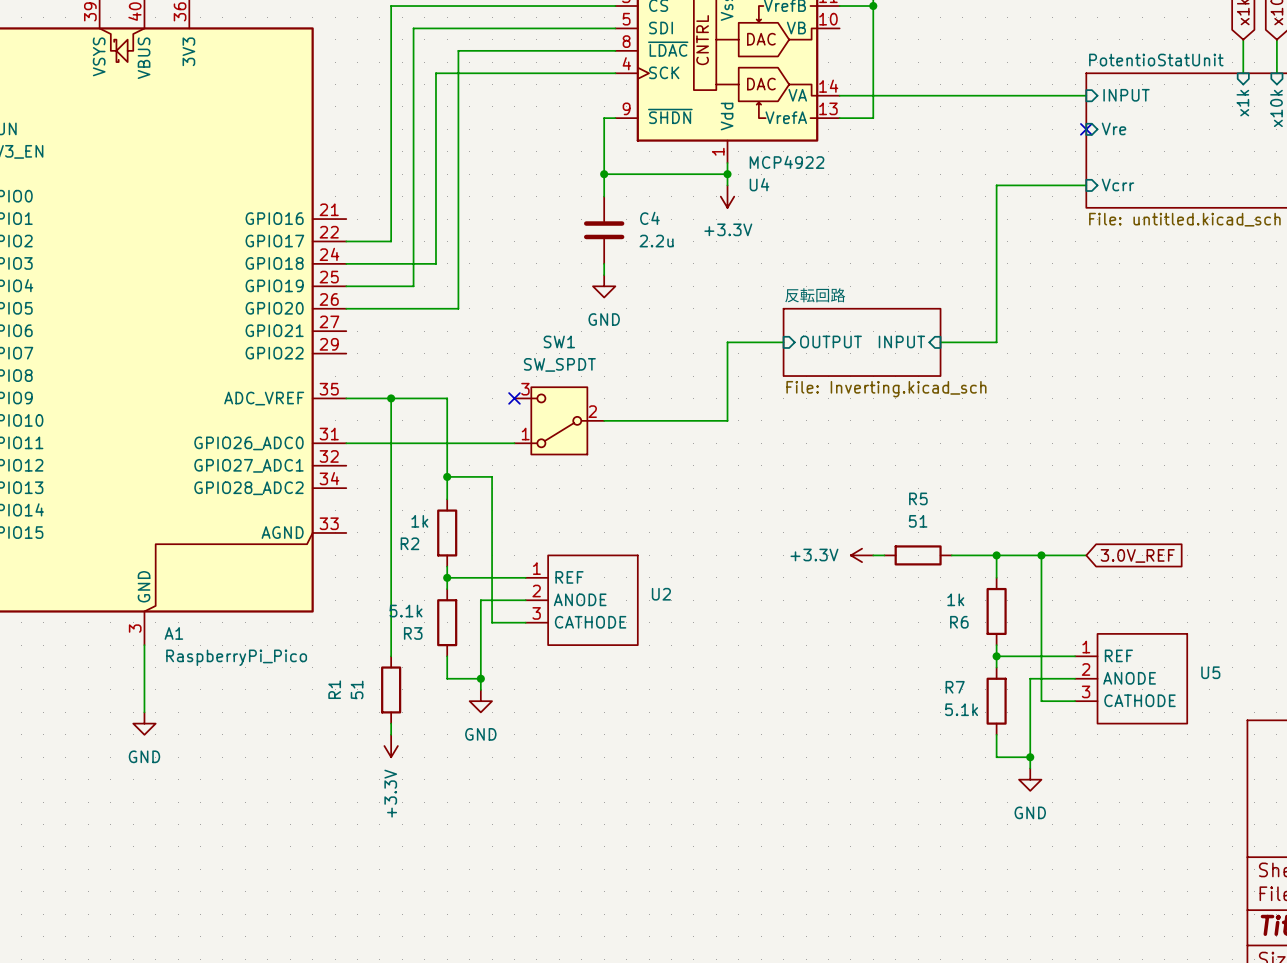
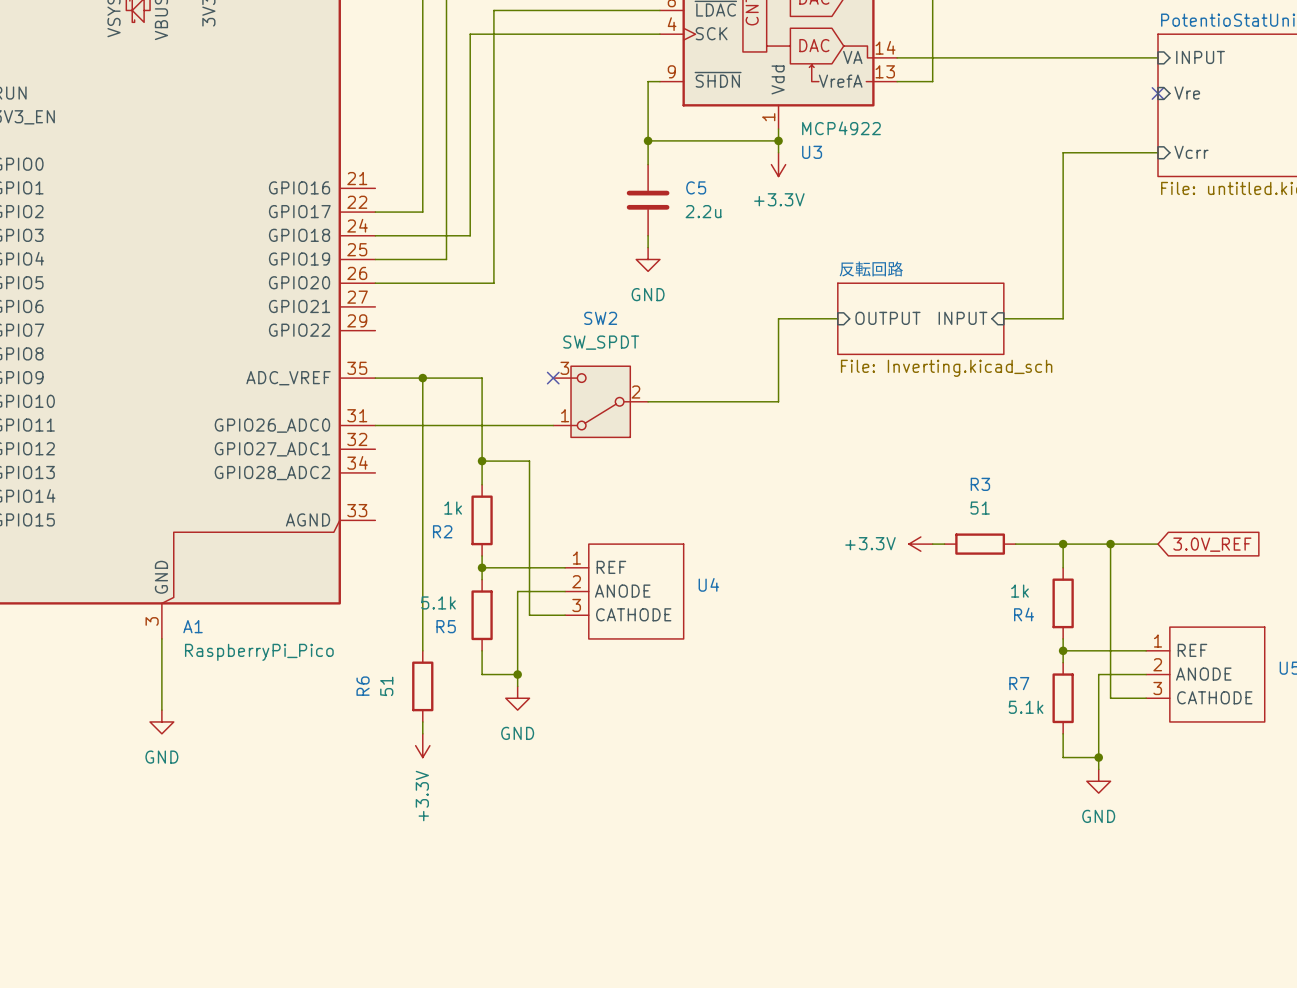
U4 name: U4 (759, 184) -> U3 (812, 152)
C4 name: C4 (649, 218) -> C5 (696, 187)
SW1 name: SW1 (559, 341) -> SW2 (600, 318)
R5 name: R5 (918, 498) -> R3 (980, 484)
U2 name: U2 (661, 594) -> U4 (708, 584)
R6 name: R6 (959, 622) -> R4 (1024, 614)
R3 name: R3 (413, 633) -> R5 (446, 626)
R1 name: R1 (334, 689) -> R6 (363, 686)

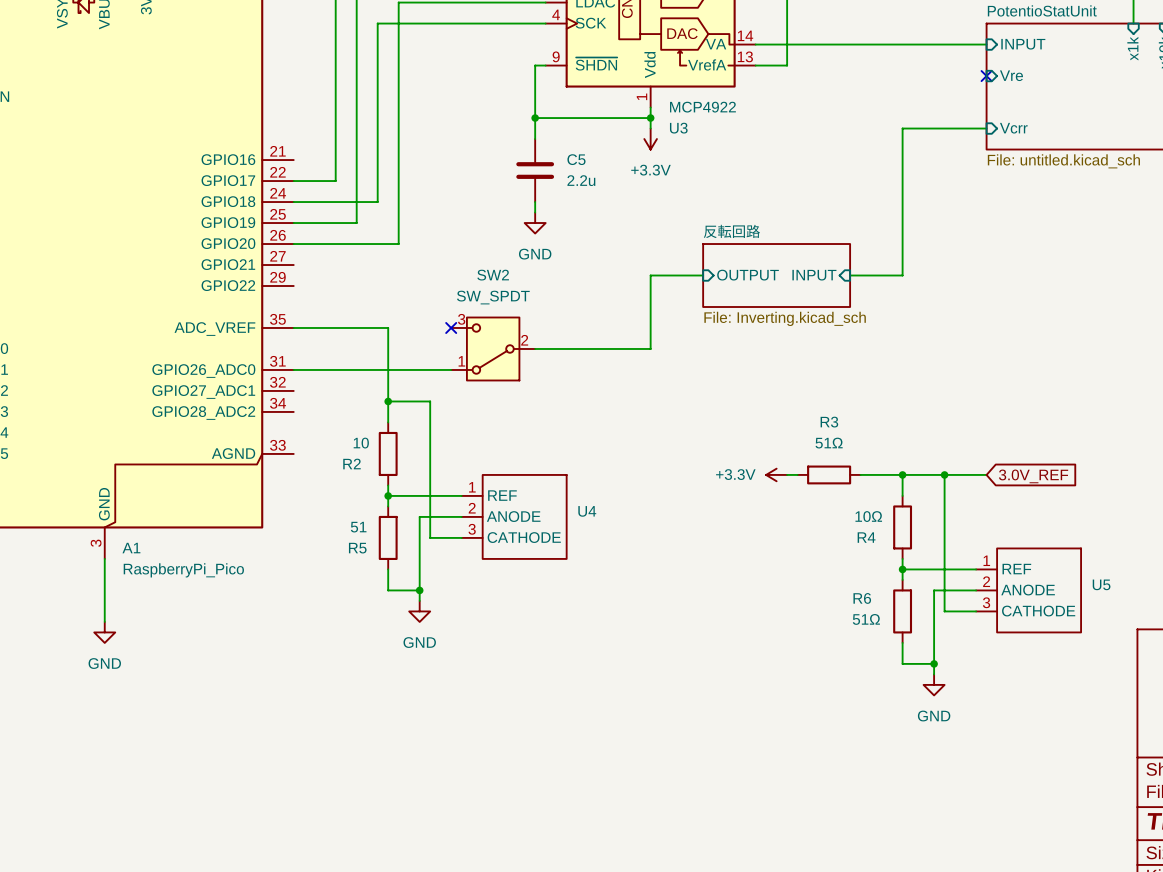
wire: (422, 378) (422, 650) -> none
junction: (422, 378) -> none
R2 value: 1k (453, 508) -> 10 (361, 443)
R3 value: 51 (980, 508) -> 51Ω (829, 443)
R4 value: 1k (1019, 591) -> 10Ω (868, 516)
R5 value: 5.1k (438, 602) -> 51 (358, 527)
R7 name: R7 (1019, 683) -> R6 (862, 598)
R6: 51 (422, 686) -> none
R7 value: 5.1k (1026, 707) -> 51Ω (866, 619)
wire: (422, 721) (422, 733) -> none
power symbol: +3.3V (422, 745) -> none

